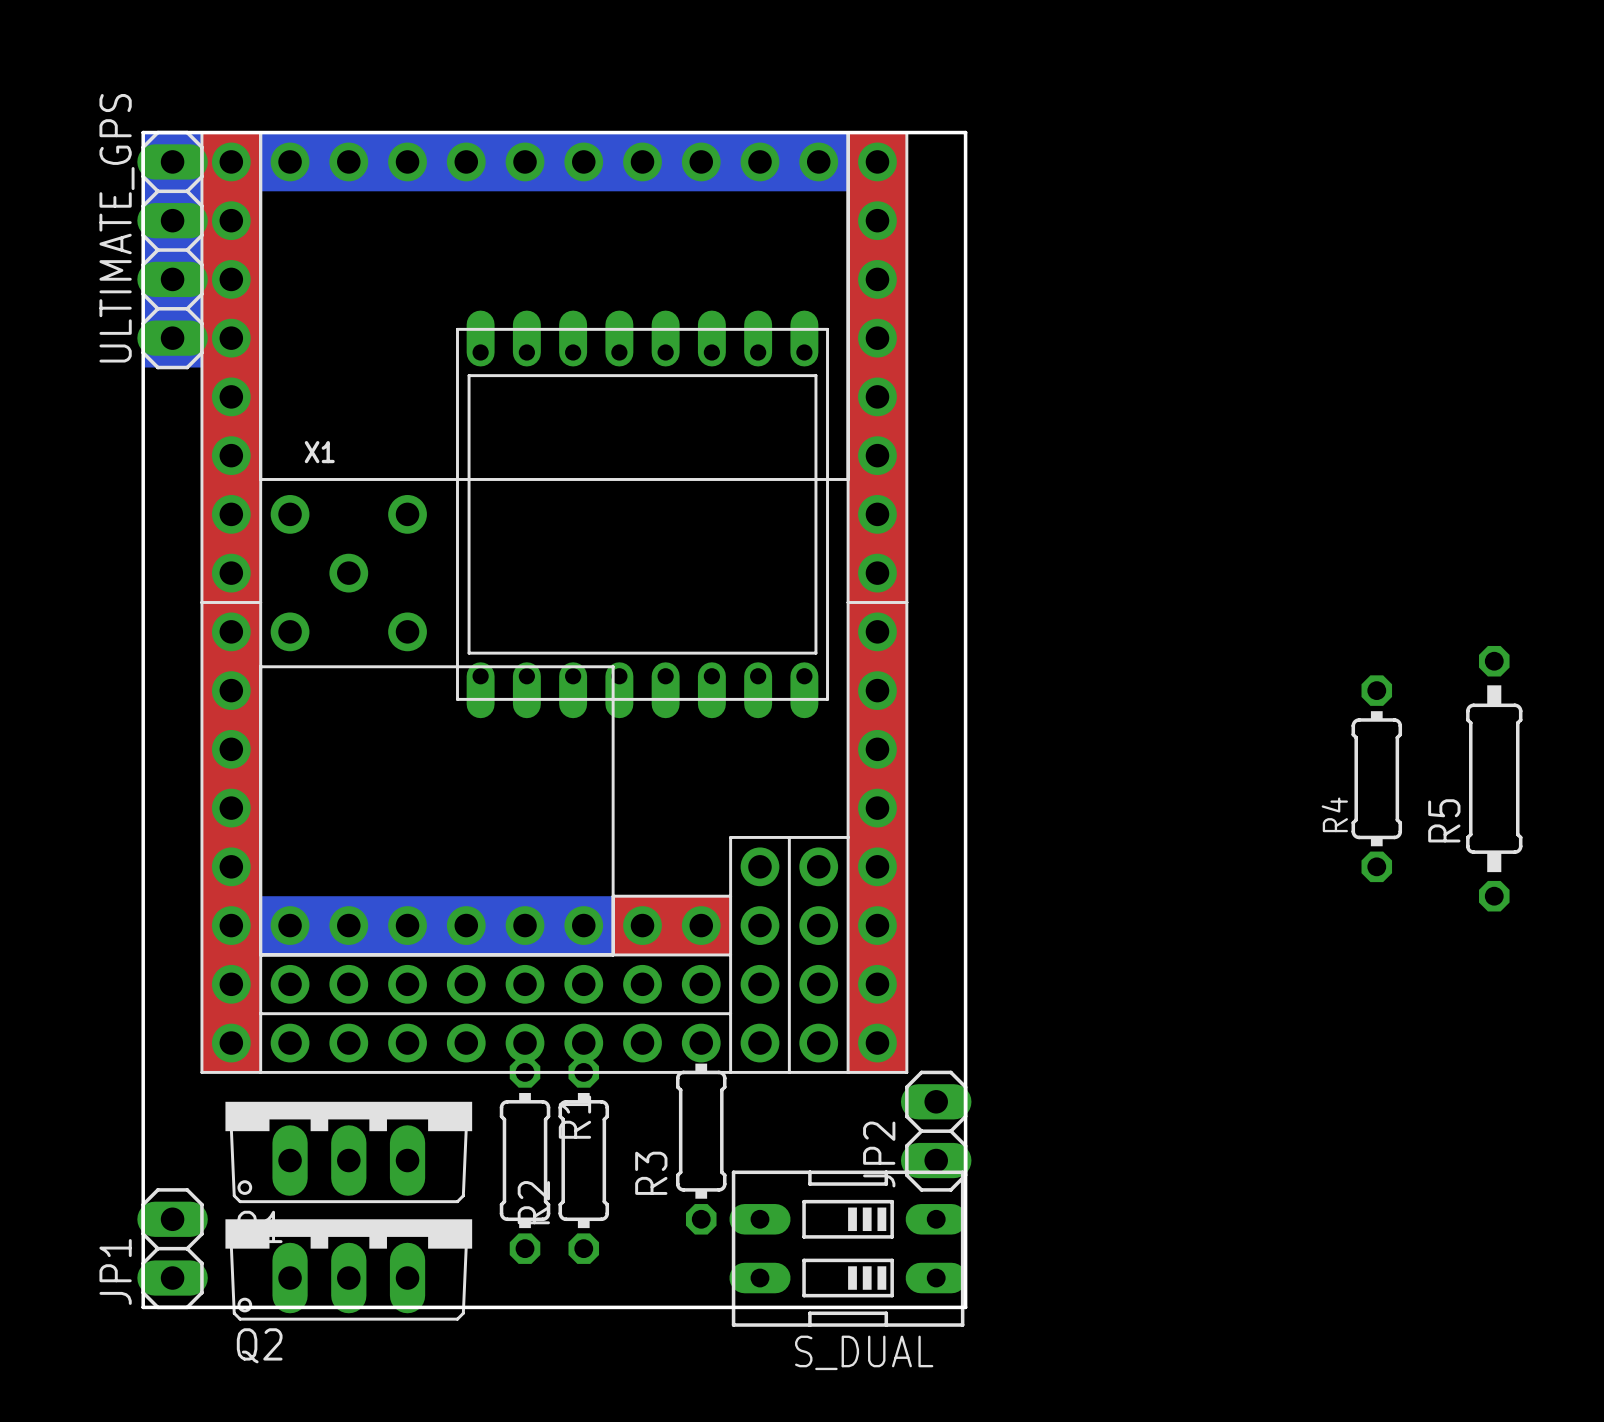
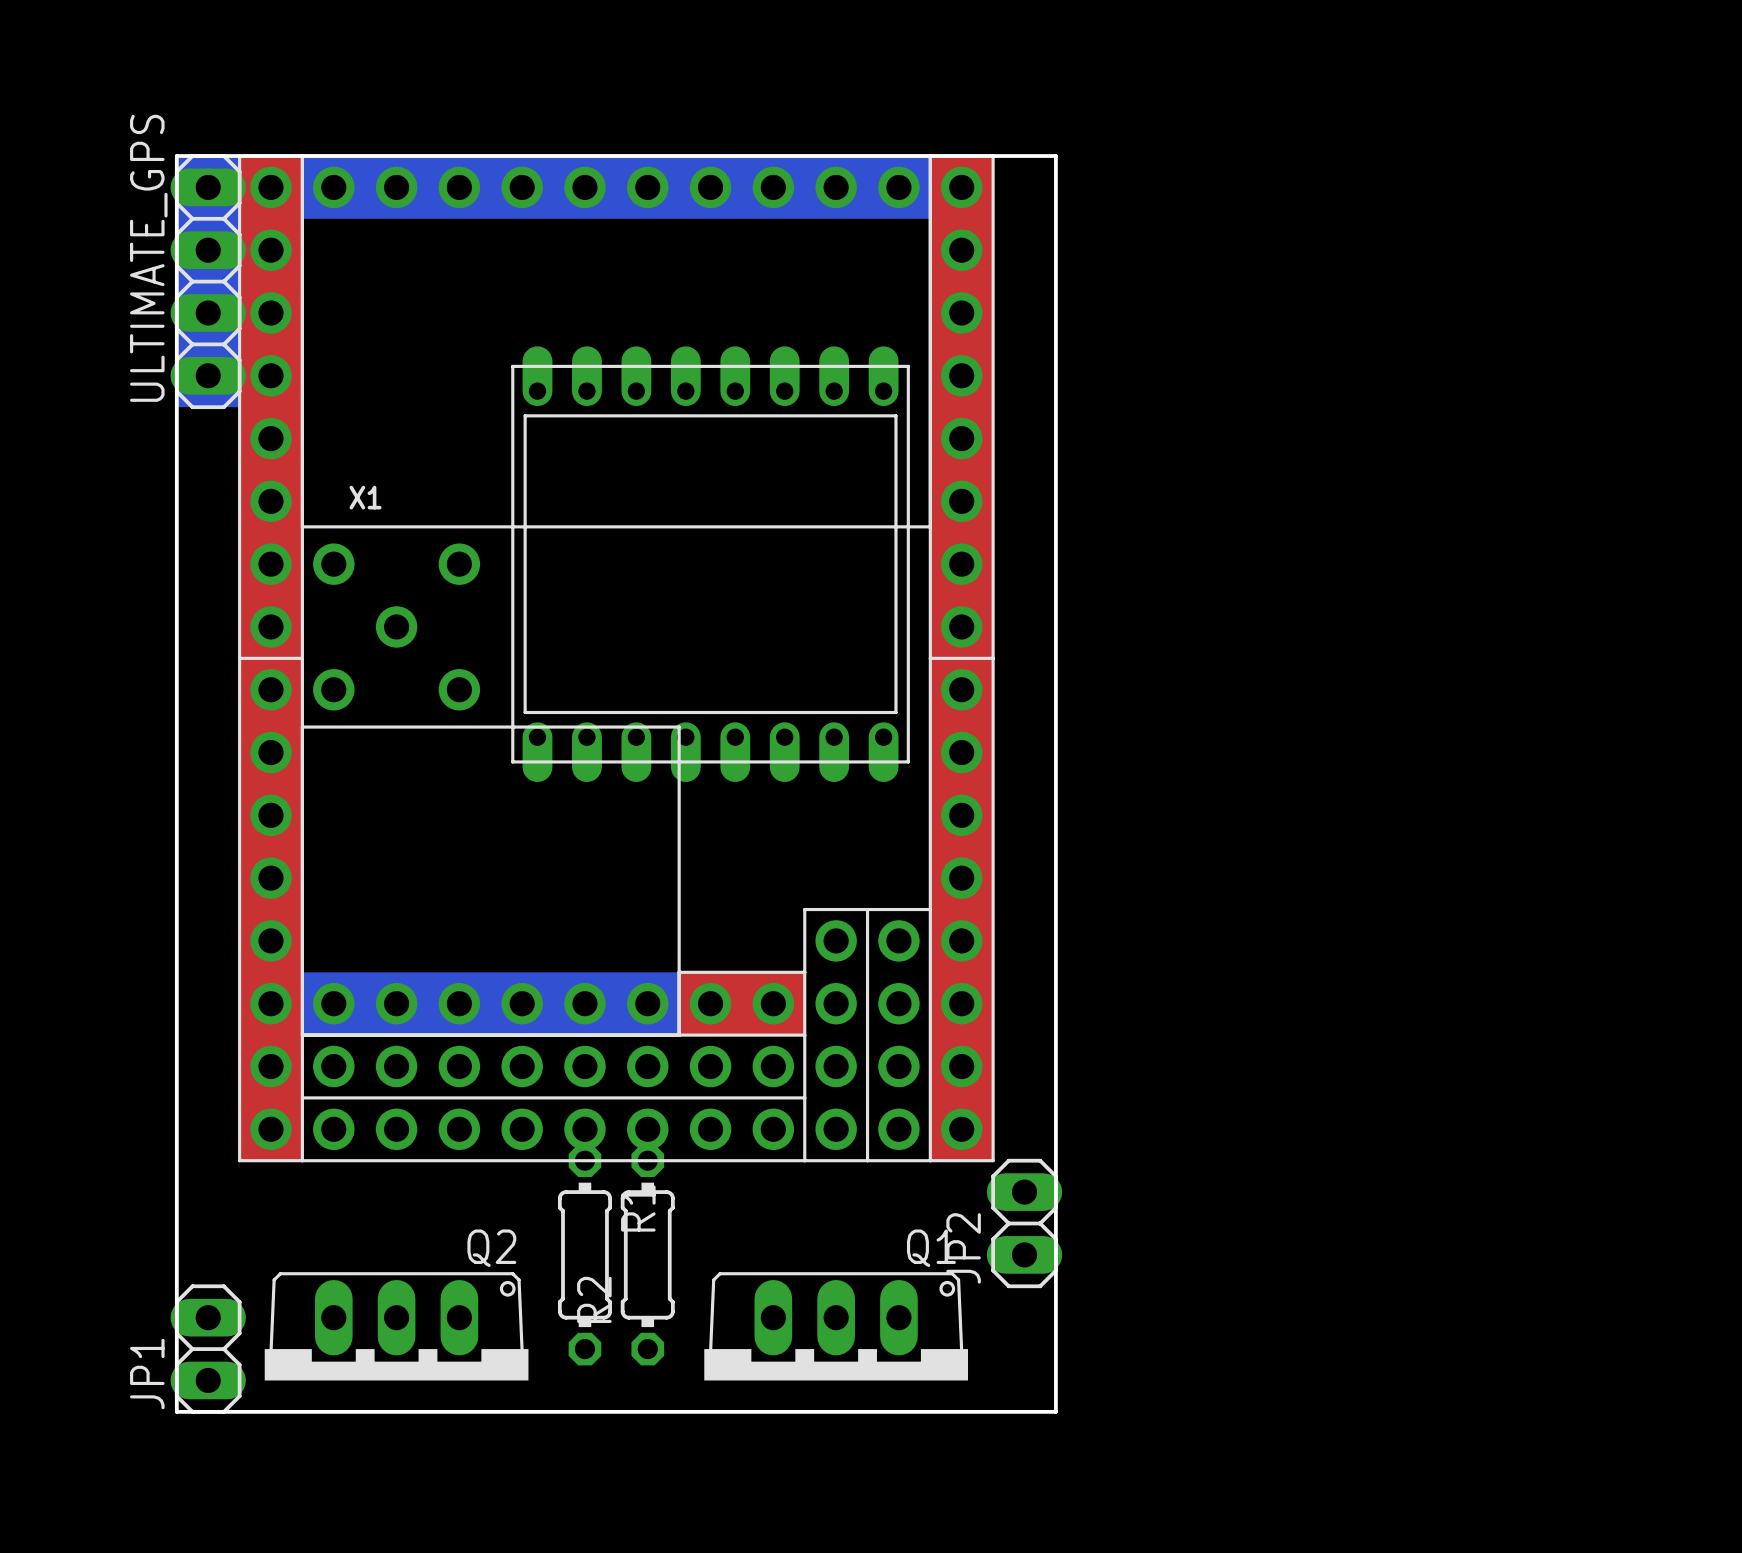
R4: (1376, 778) -> none
R5: (1494, 778) -> none
R3: (701, 1131) -> none
Q1 rotation: 0° (348, 1152) -> 180° (836, 1326)
Q1 position: (348, 1152) -> (836, 1326)
part: (848, 1248) -> none
Q2 rotation: 0° (348, 1269) -> 180° (396, 1326)

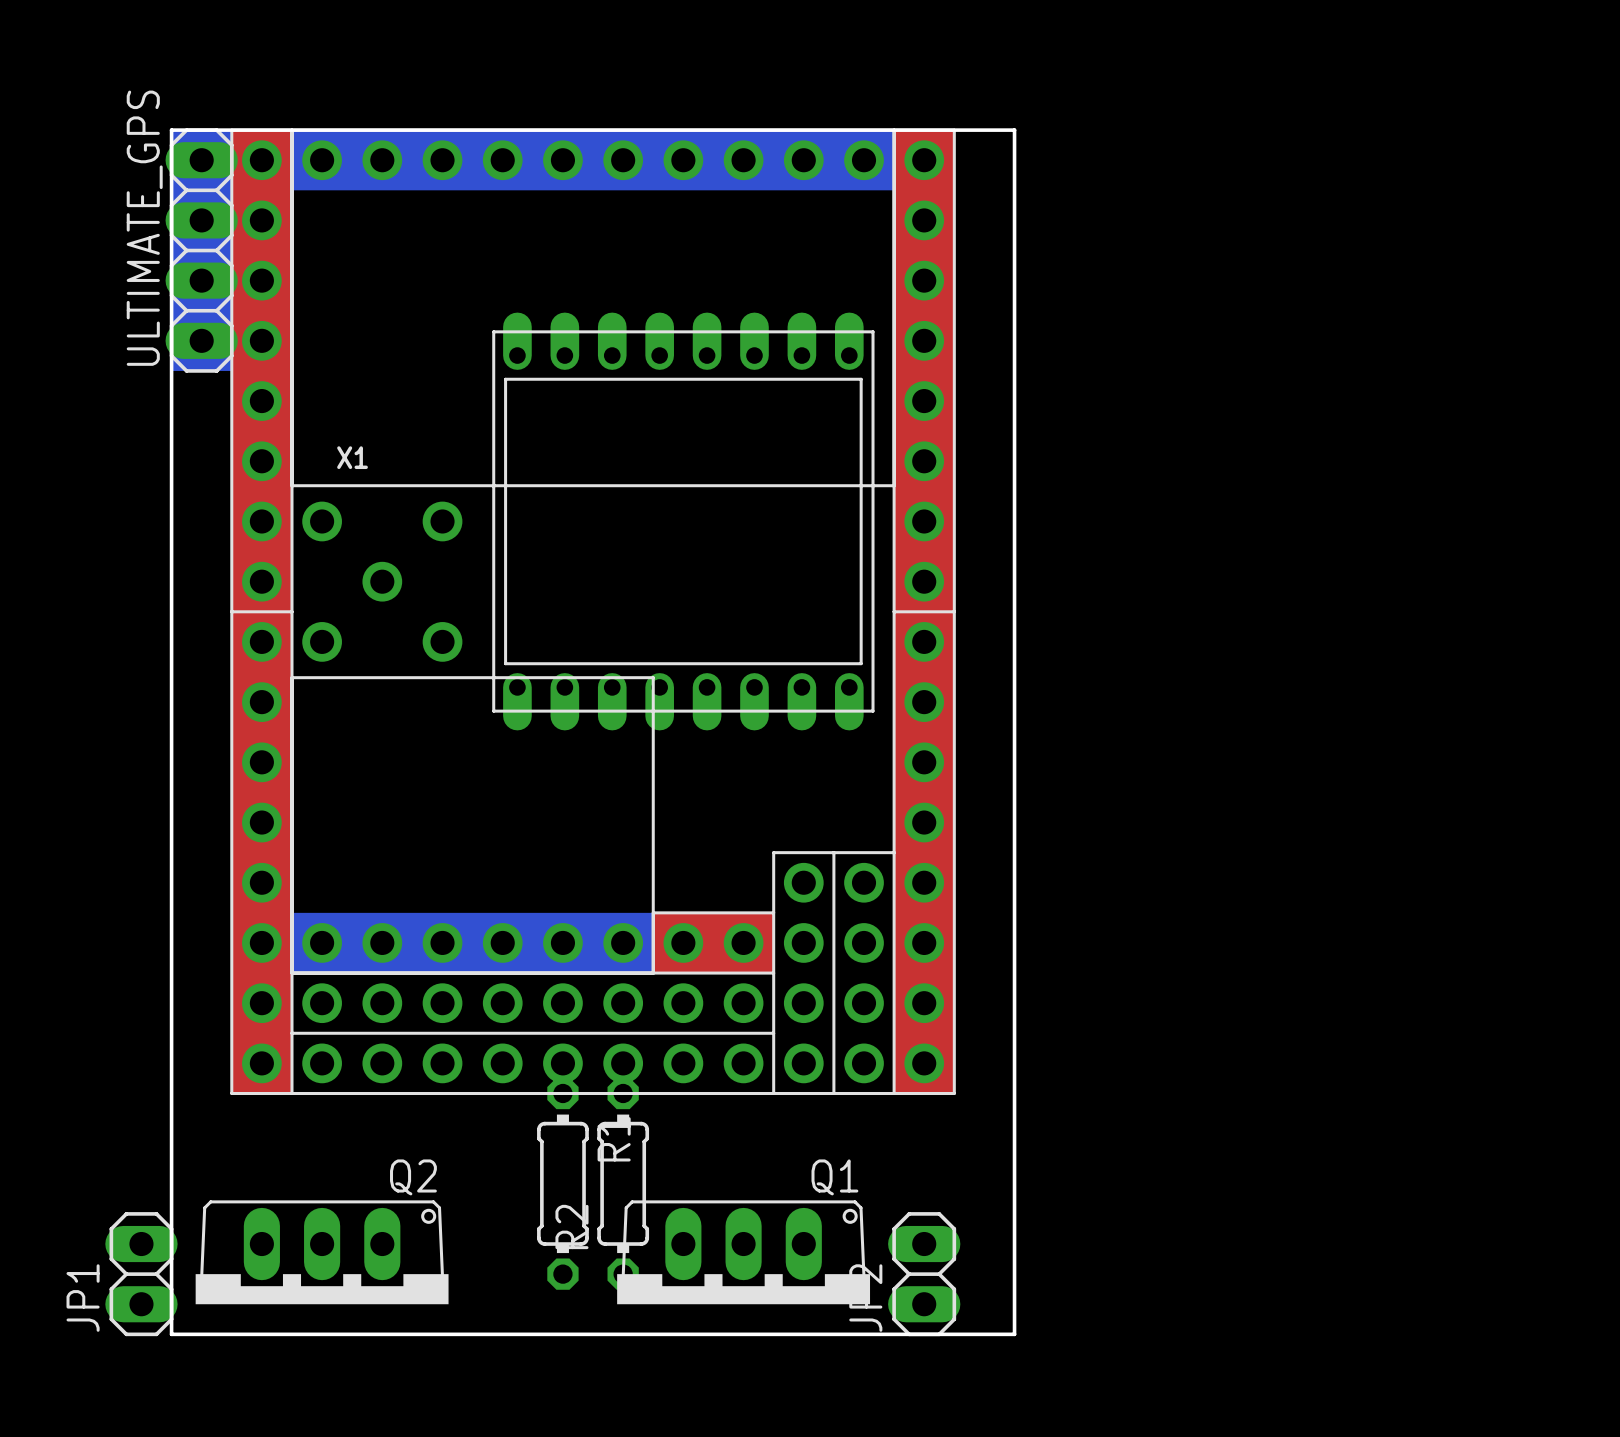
JP2 position: (1024, 1223) -> (924, 1274)
Q2 position: (396, 1326) -> (322, 1252)
Q1 position: (836, 1326) -> (743, 1252)
JP1 position: (208, 1349) -> (141, 1274)

